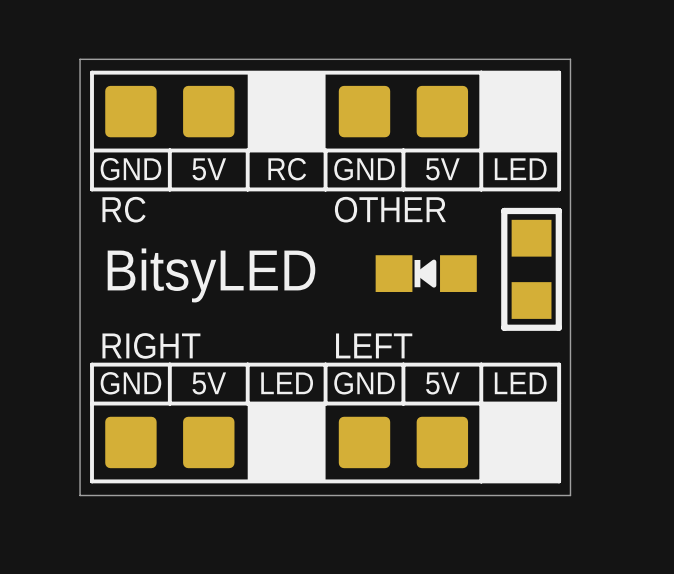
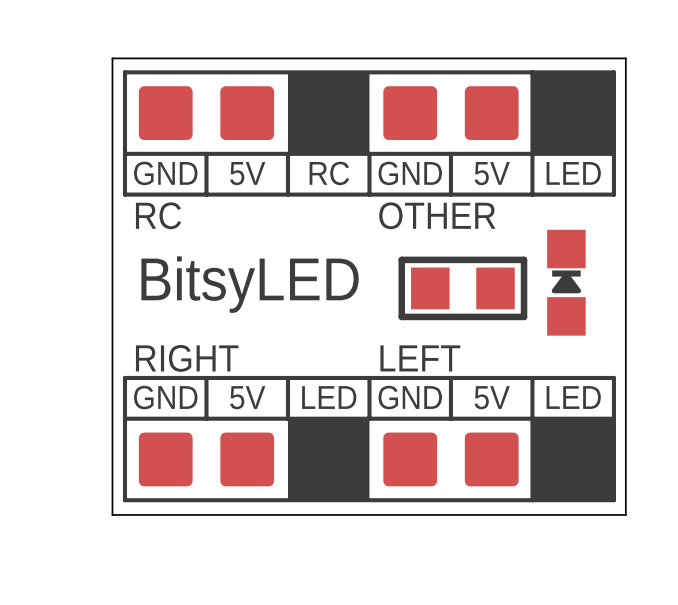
part footprint: [501, 207, 562, 331] -> [547, 229, 586, 336]
part footprint: [375, 255, 477, 293] -> [398, 256, 528, 321]

